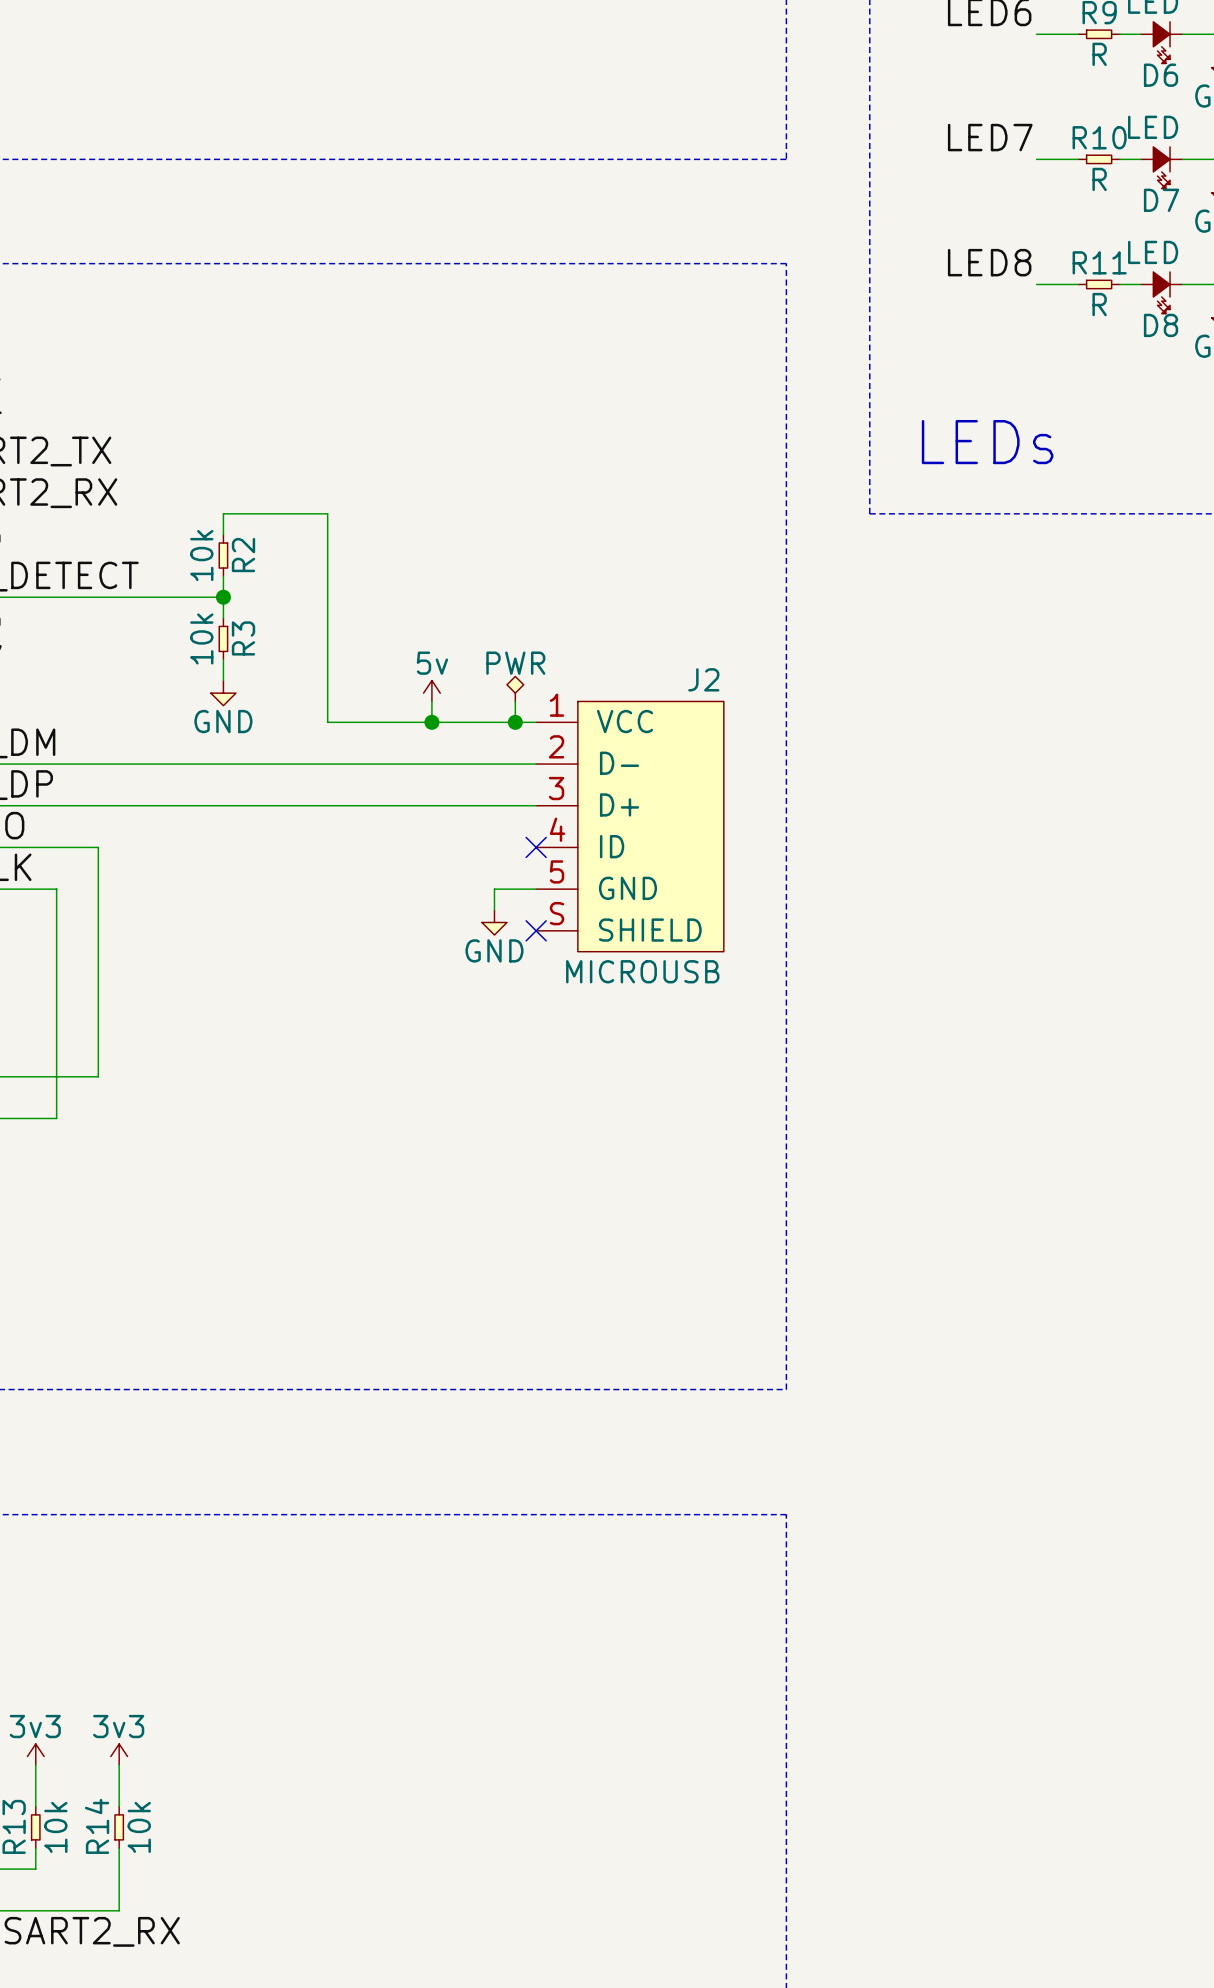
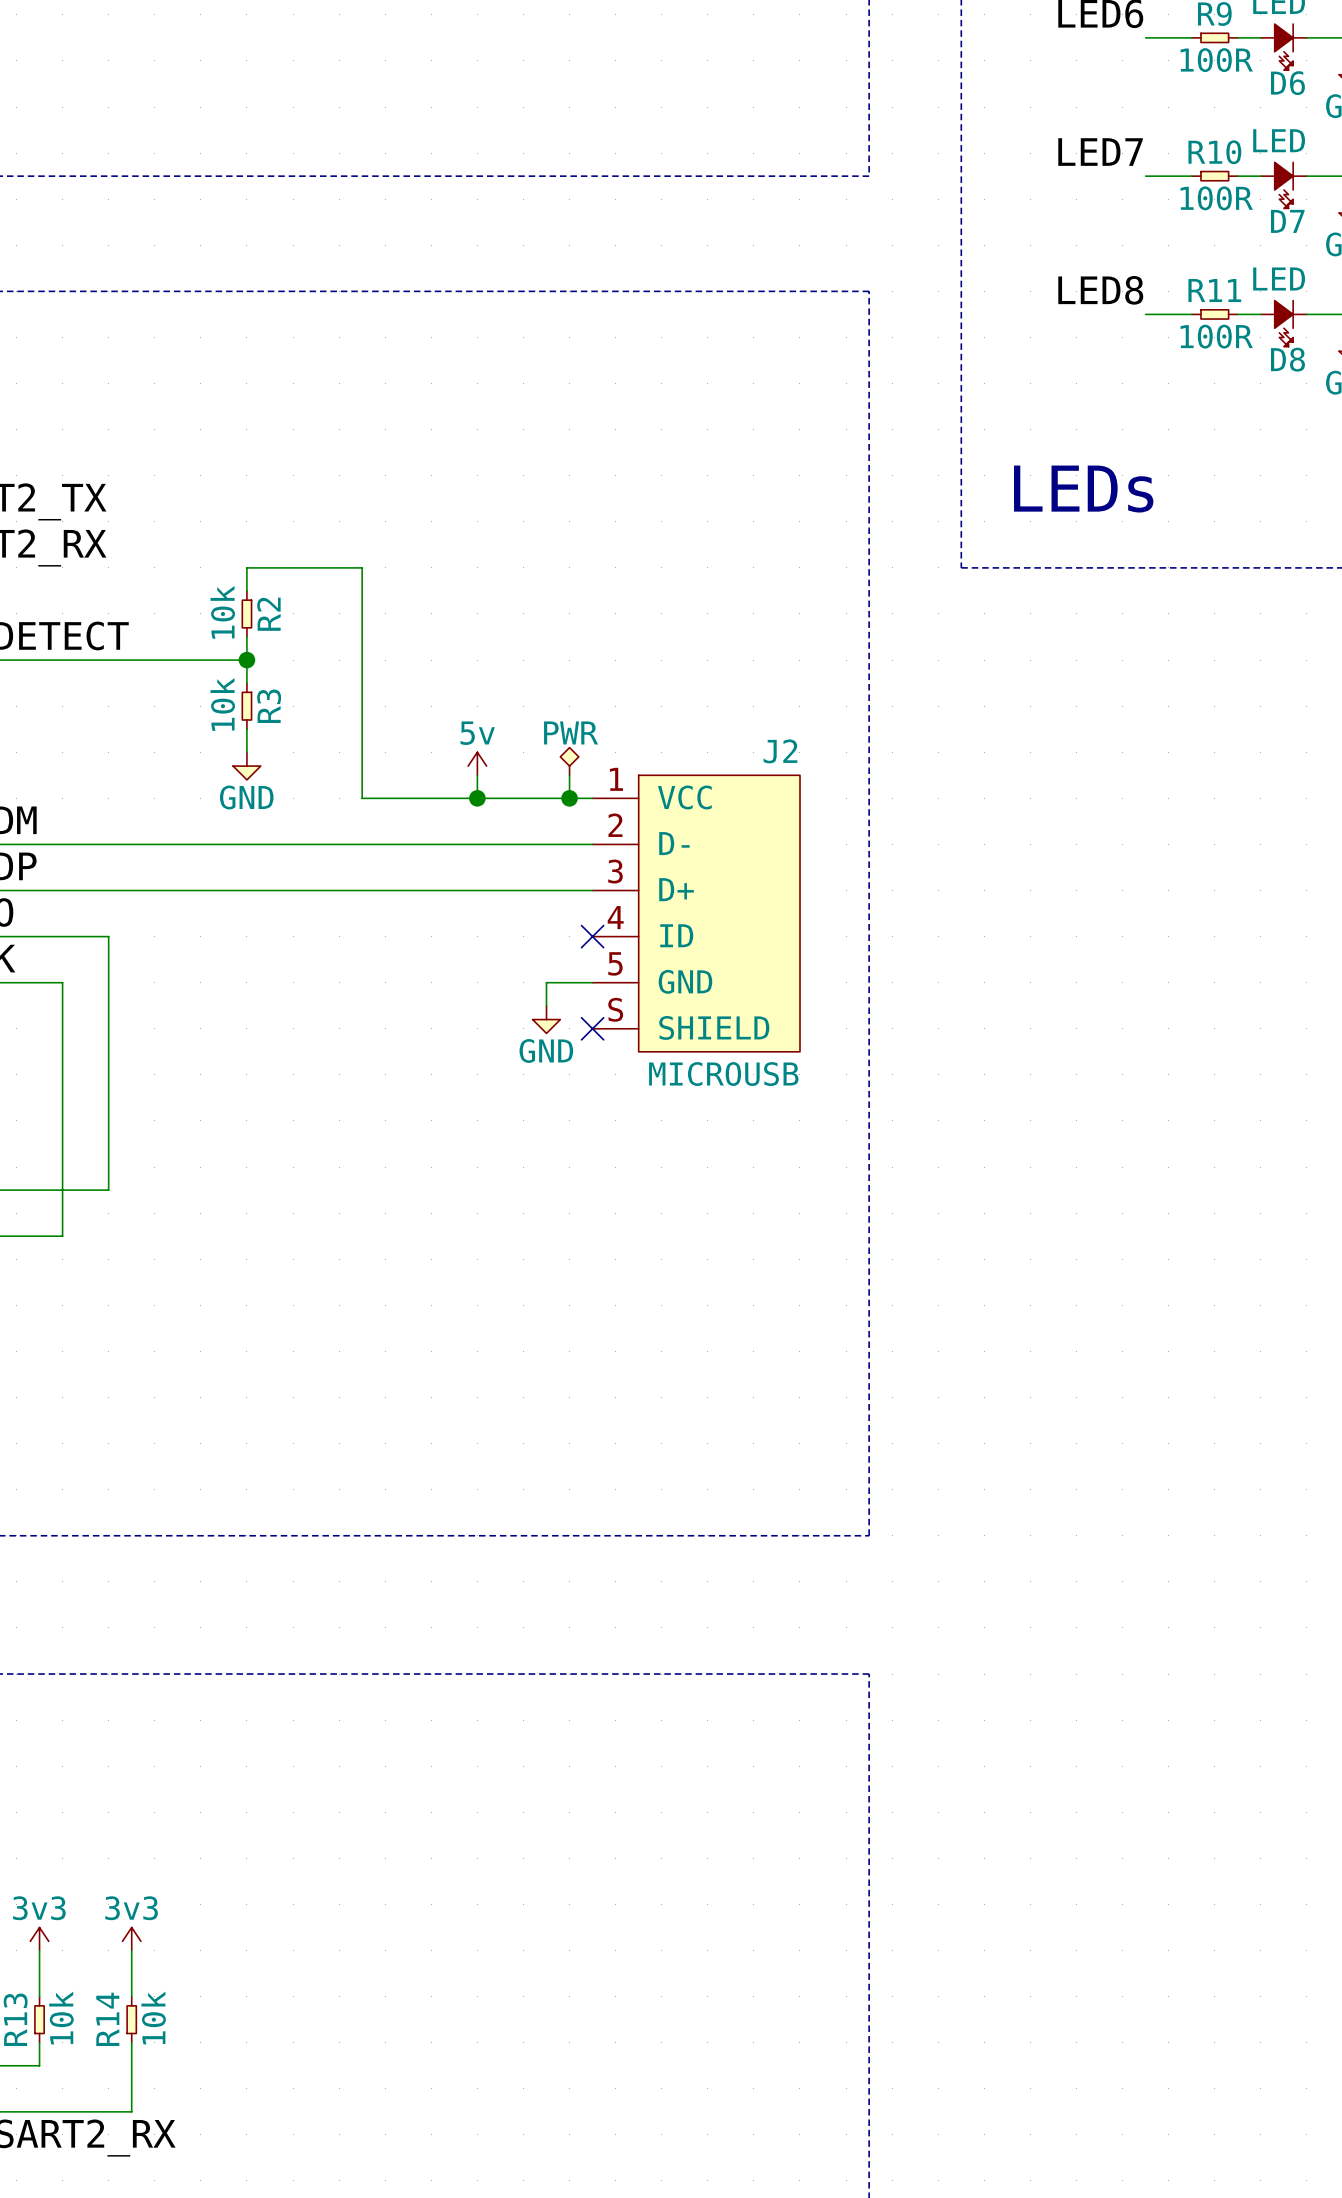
R9 value: R (1099, 54) -> 100R (1216, 60)
R10 value: R (1099, 179) -> 100R (1216, 198)
R11 value: R (1099, 304) -> 100R (1216, 336)

